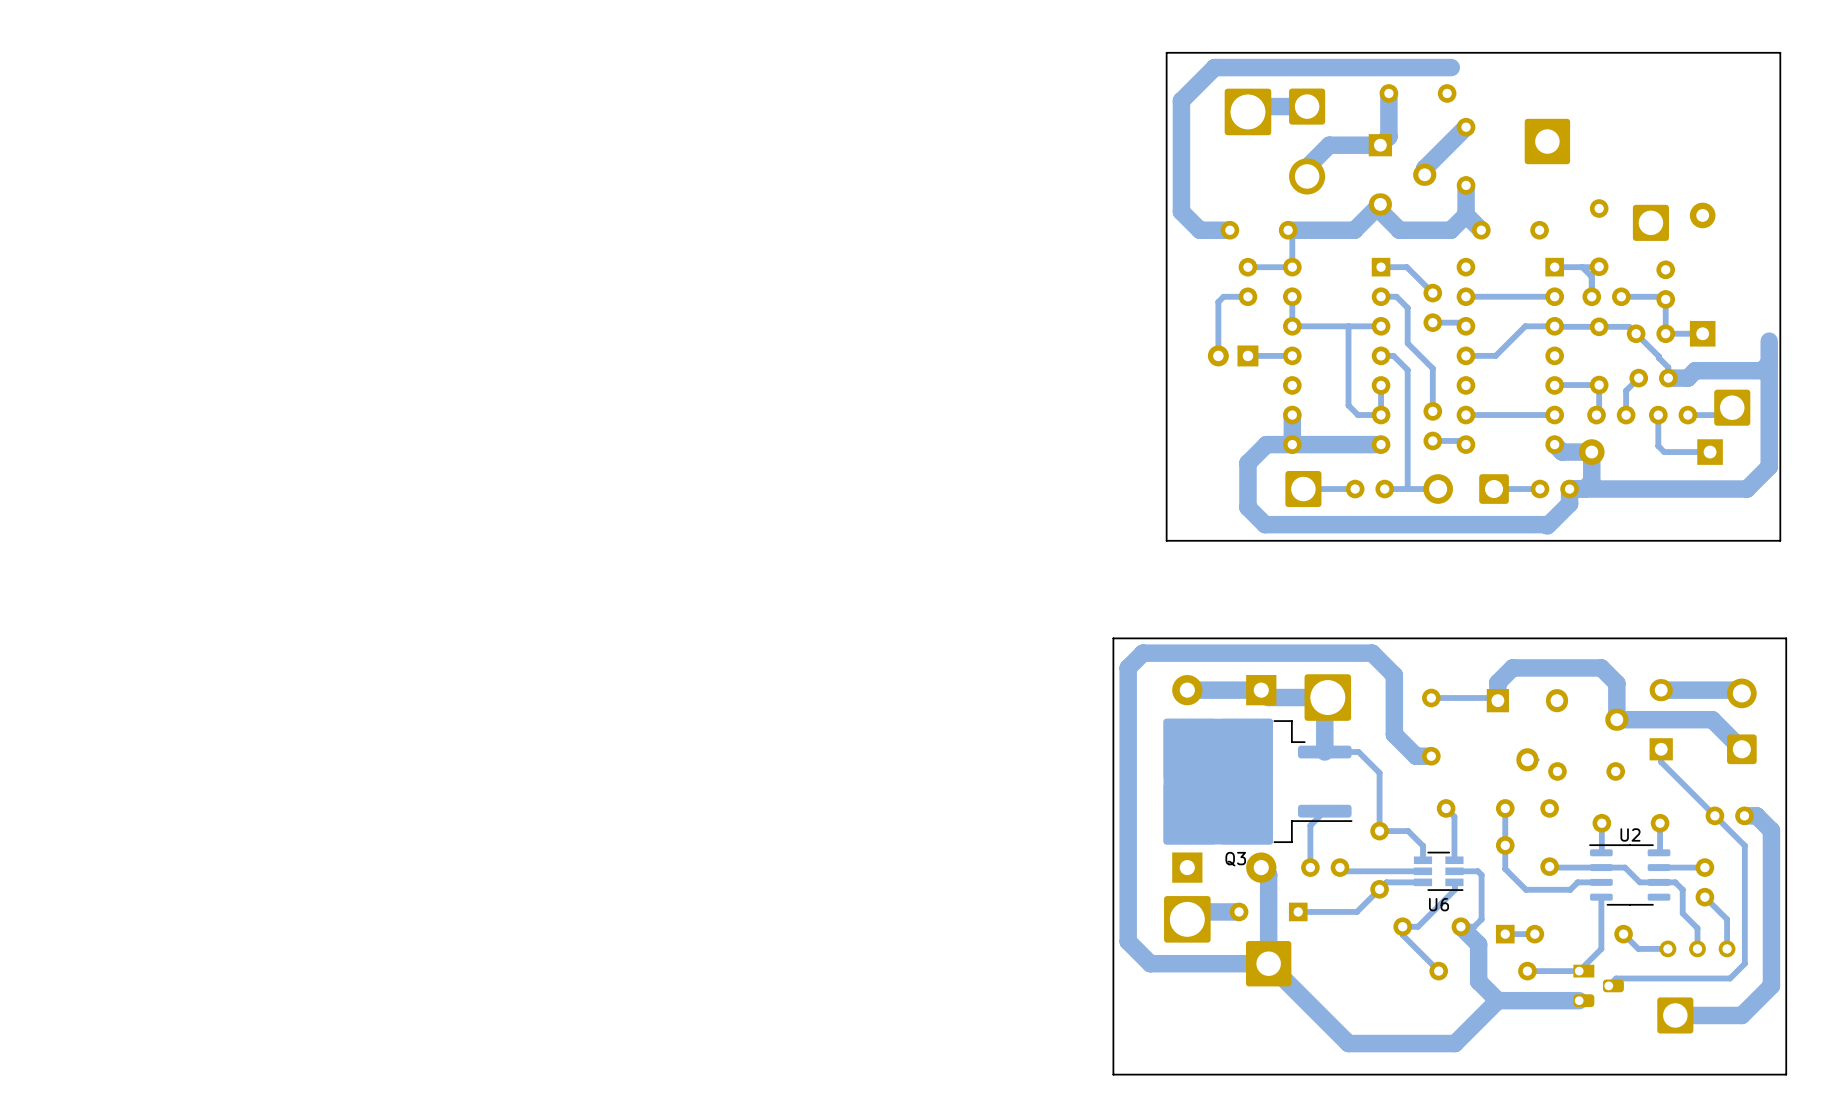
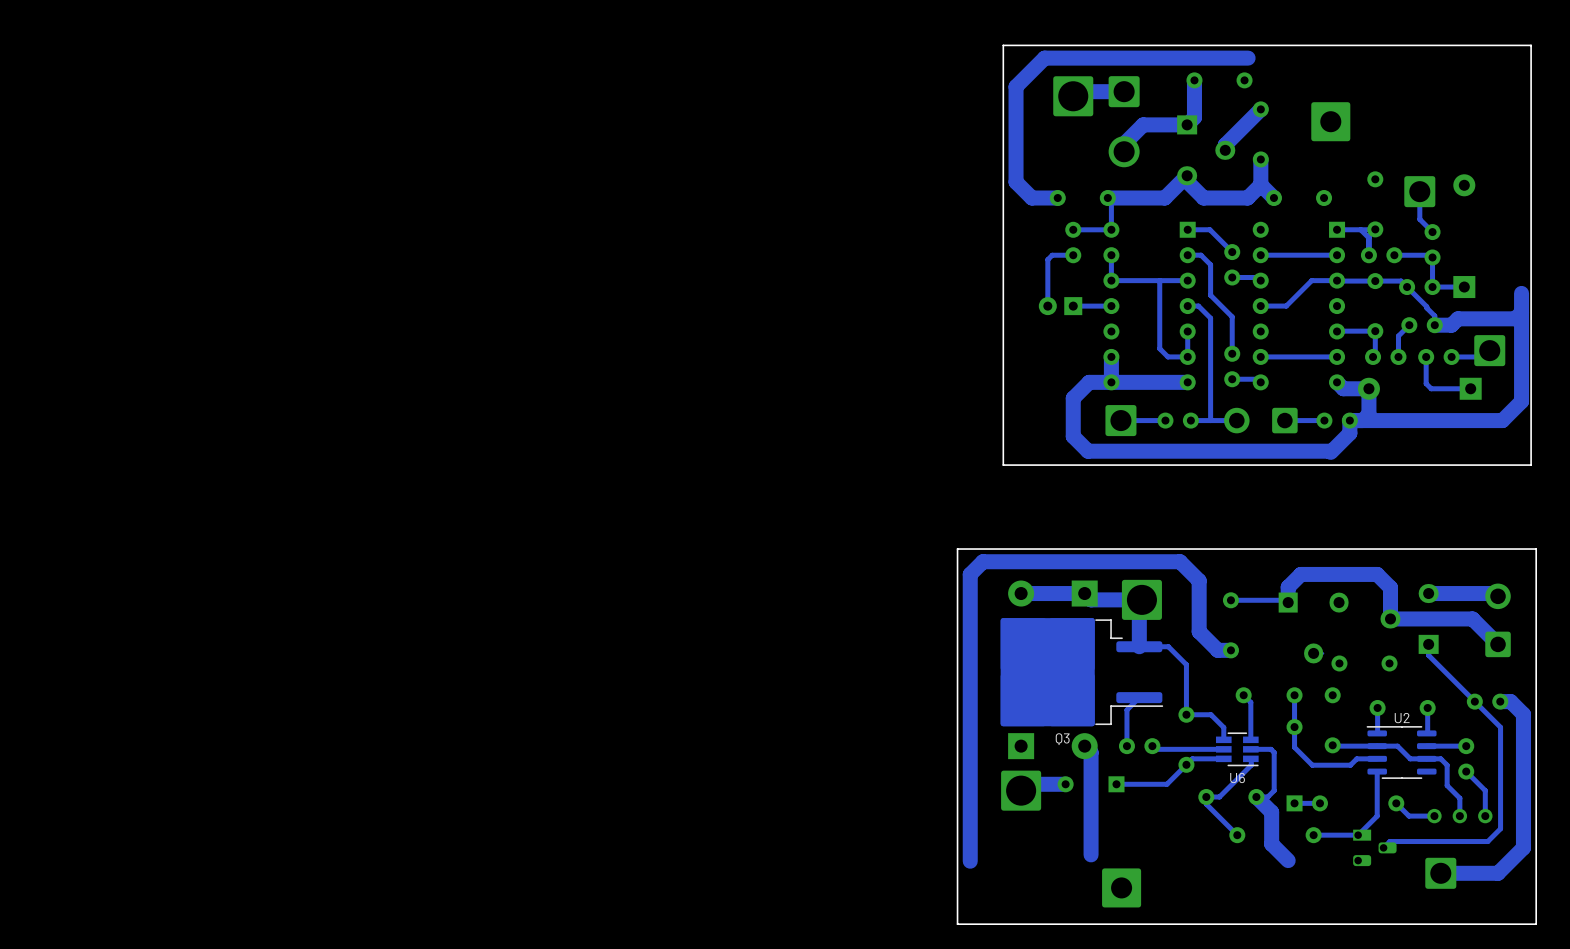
track: none -> (1419, 191) (1419, 219) (1432, 232)
track: (1128, 941) (1150, 963) (1268, 963) (1348, 1043) (1454, 1043) (1497, 1000) (1579, 1000) -> (970, 809) (970, 861)
track: none -> (1091, 828) (1091, 854)
part position: (1268, 963) -> (1121, 887)

